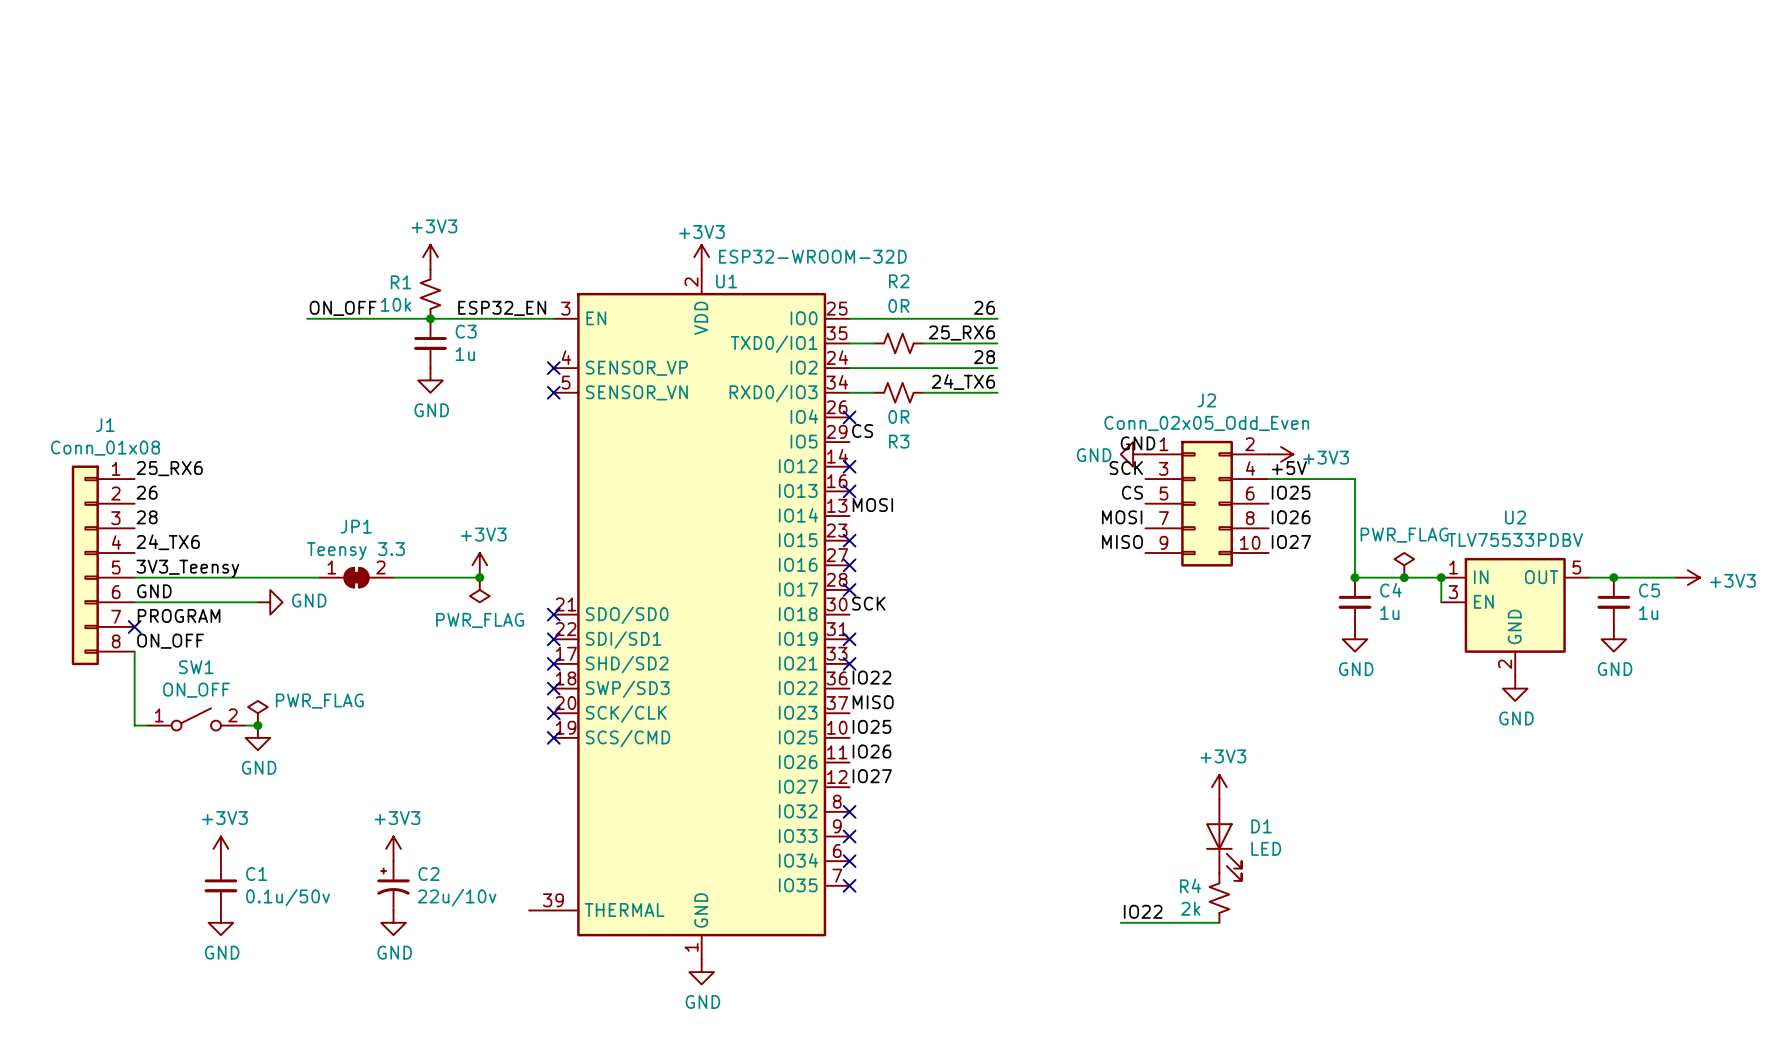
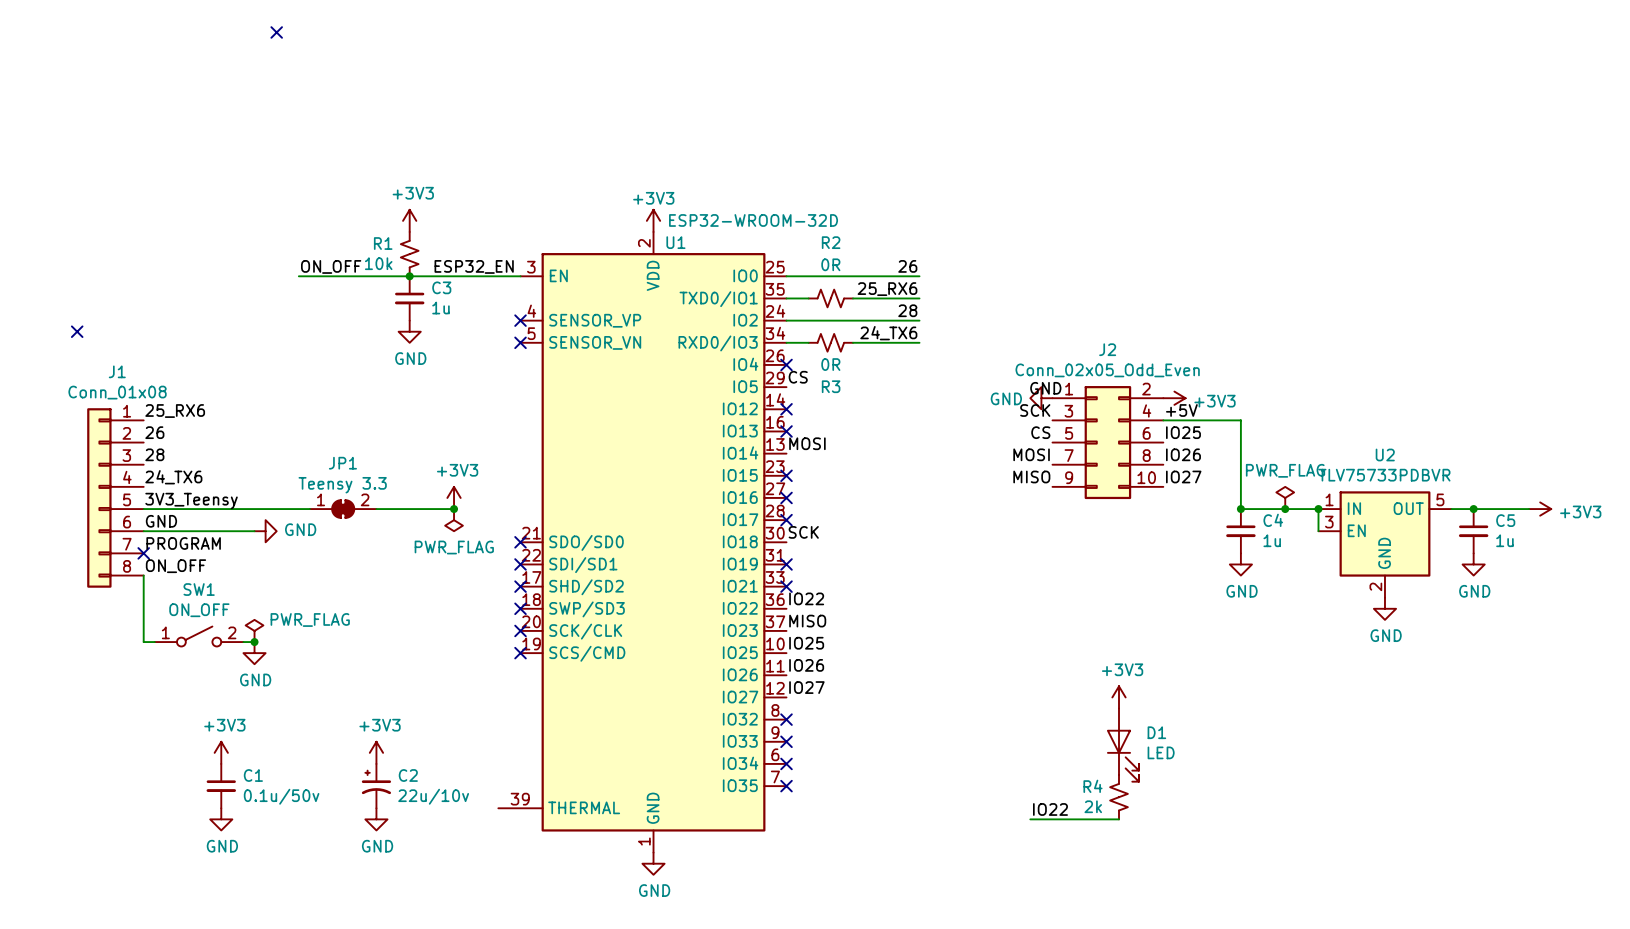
no-connect mark: none -> (276, 32)
no-connect mark: none -> (77, 331)
U2 value: TLV75533PDBV (1515, 539) -> TLV75733PDBVR (1384, 475)

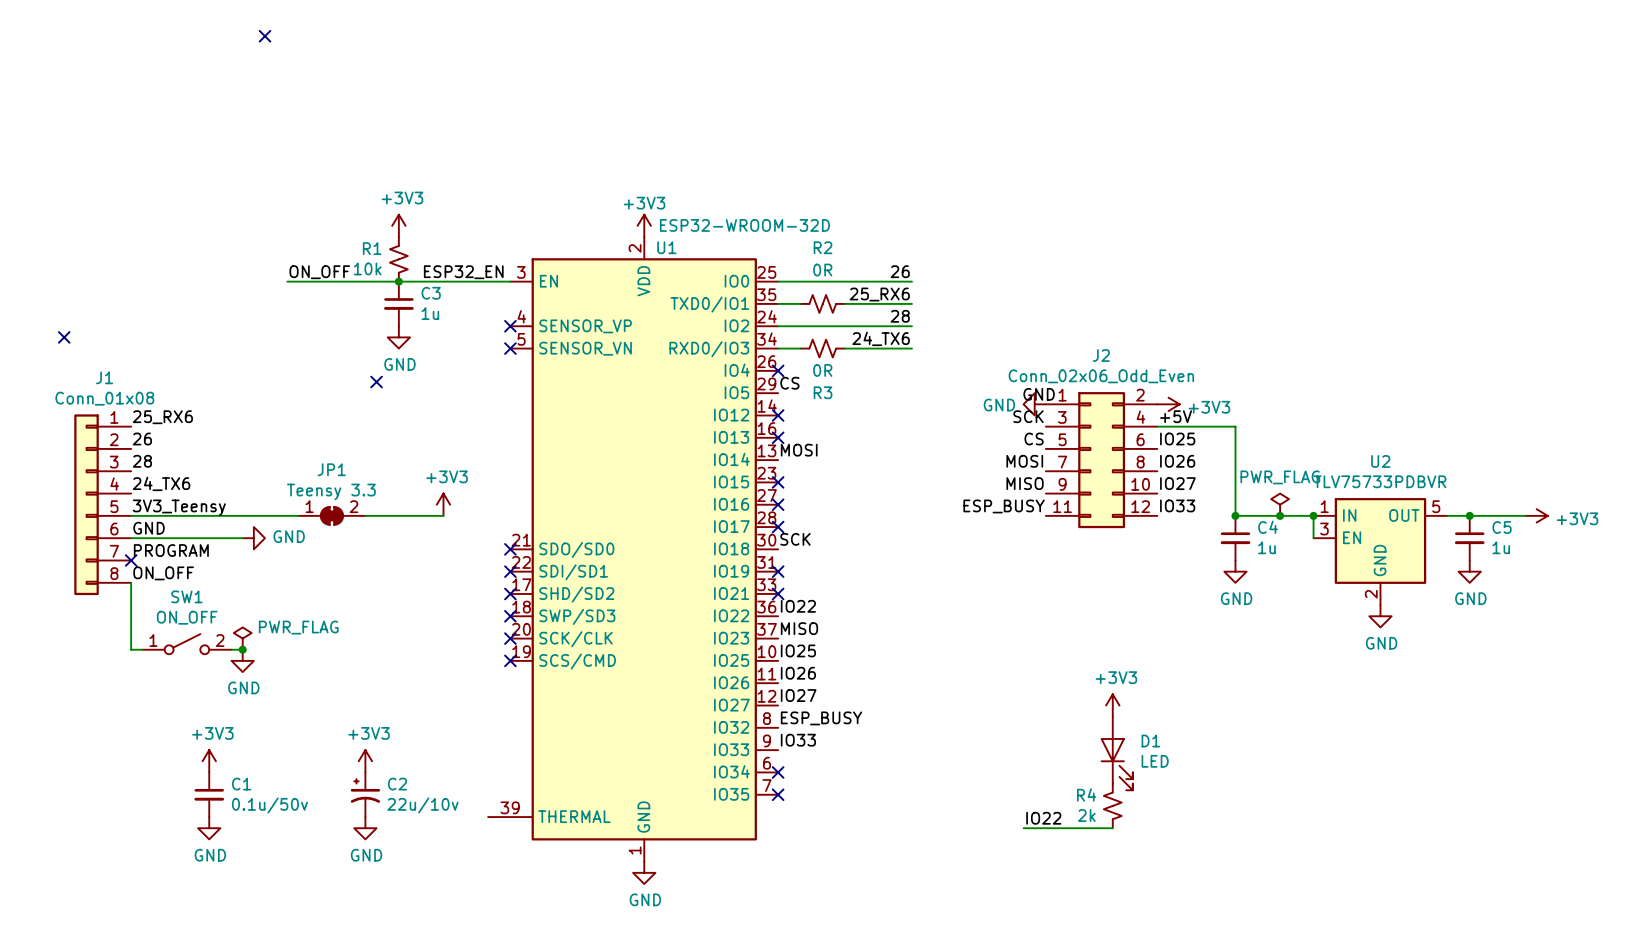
J2 value: Conn_02x05_Odd_Even (1107, 370) -> Conn_02x06_Odd_Even (1101, 376)
no-connect mark: none -> (376, 382)
J2 symbol: [1052, 386, 1164, 500] -> [1045, 392, 1158, 529]
label: none -> ESP_BUSY (1004, 506)
label: none -> IO33 (1177, 505)
junction: (454, 509) -> none
power symbol: PWR_FLAG (454, 520) -> none
label: none -> ESP_BUSY (821, 718)
no-connect mark: (786, 719) -> none
label: none -> IO33 (798, 740)
no-connect mark: (786, 741) -> none

